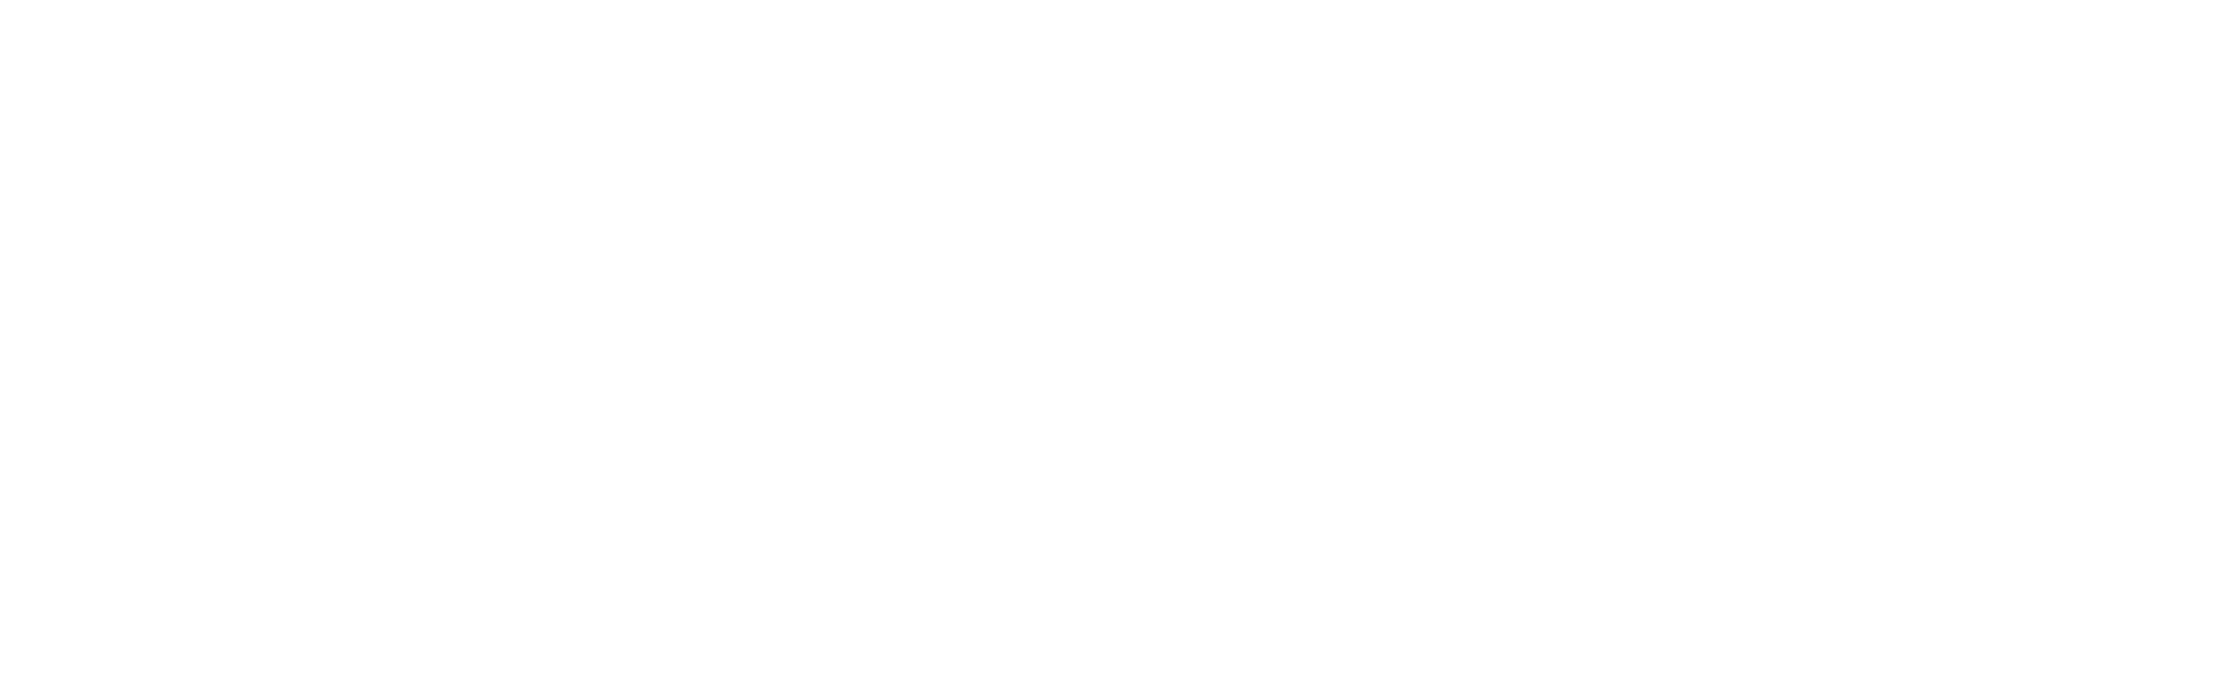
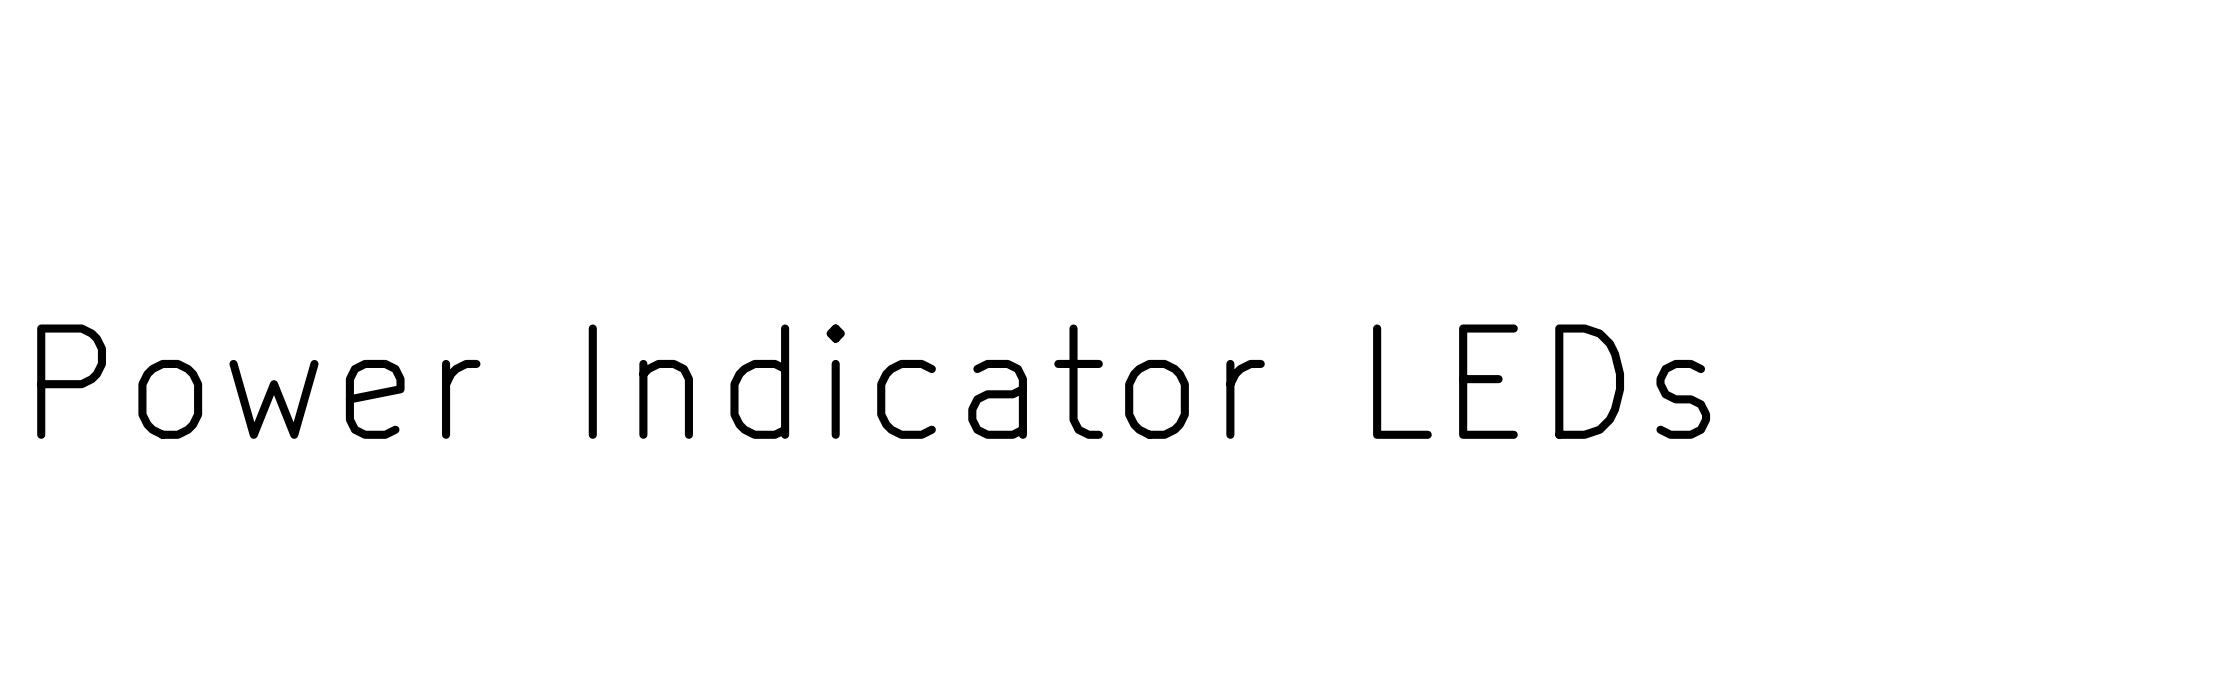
text: none -> Power Indicator LEDs (873, 381)

